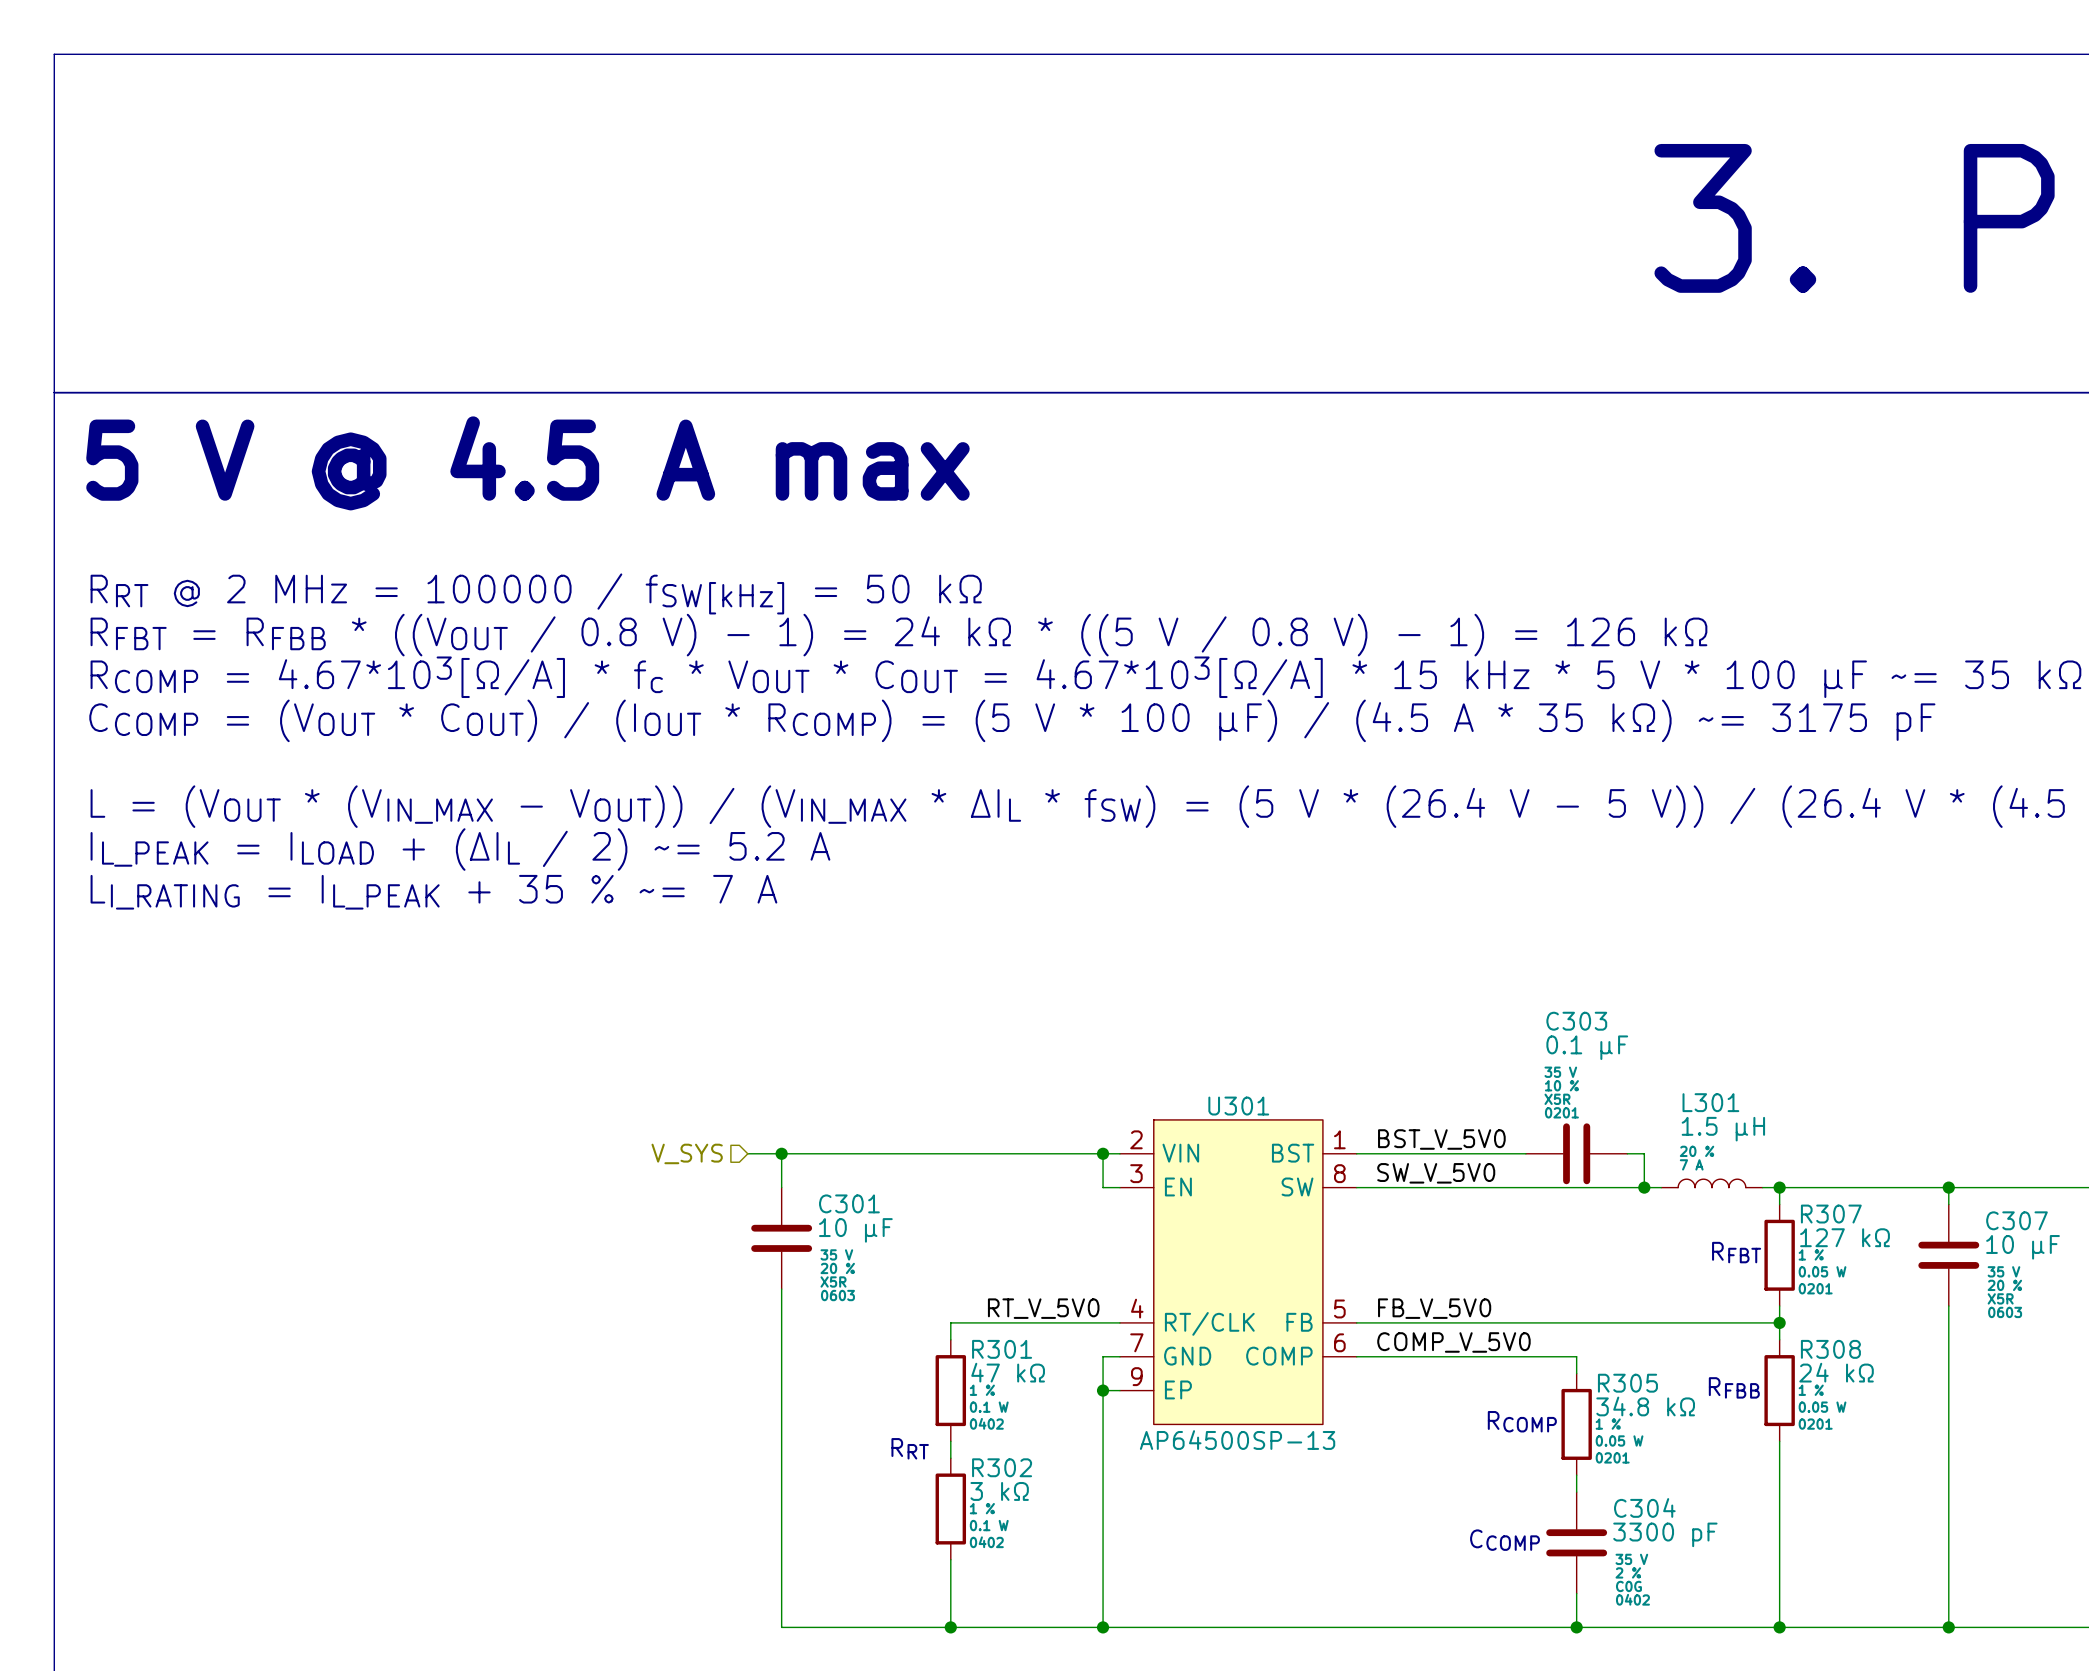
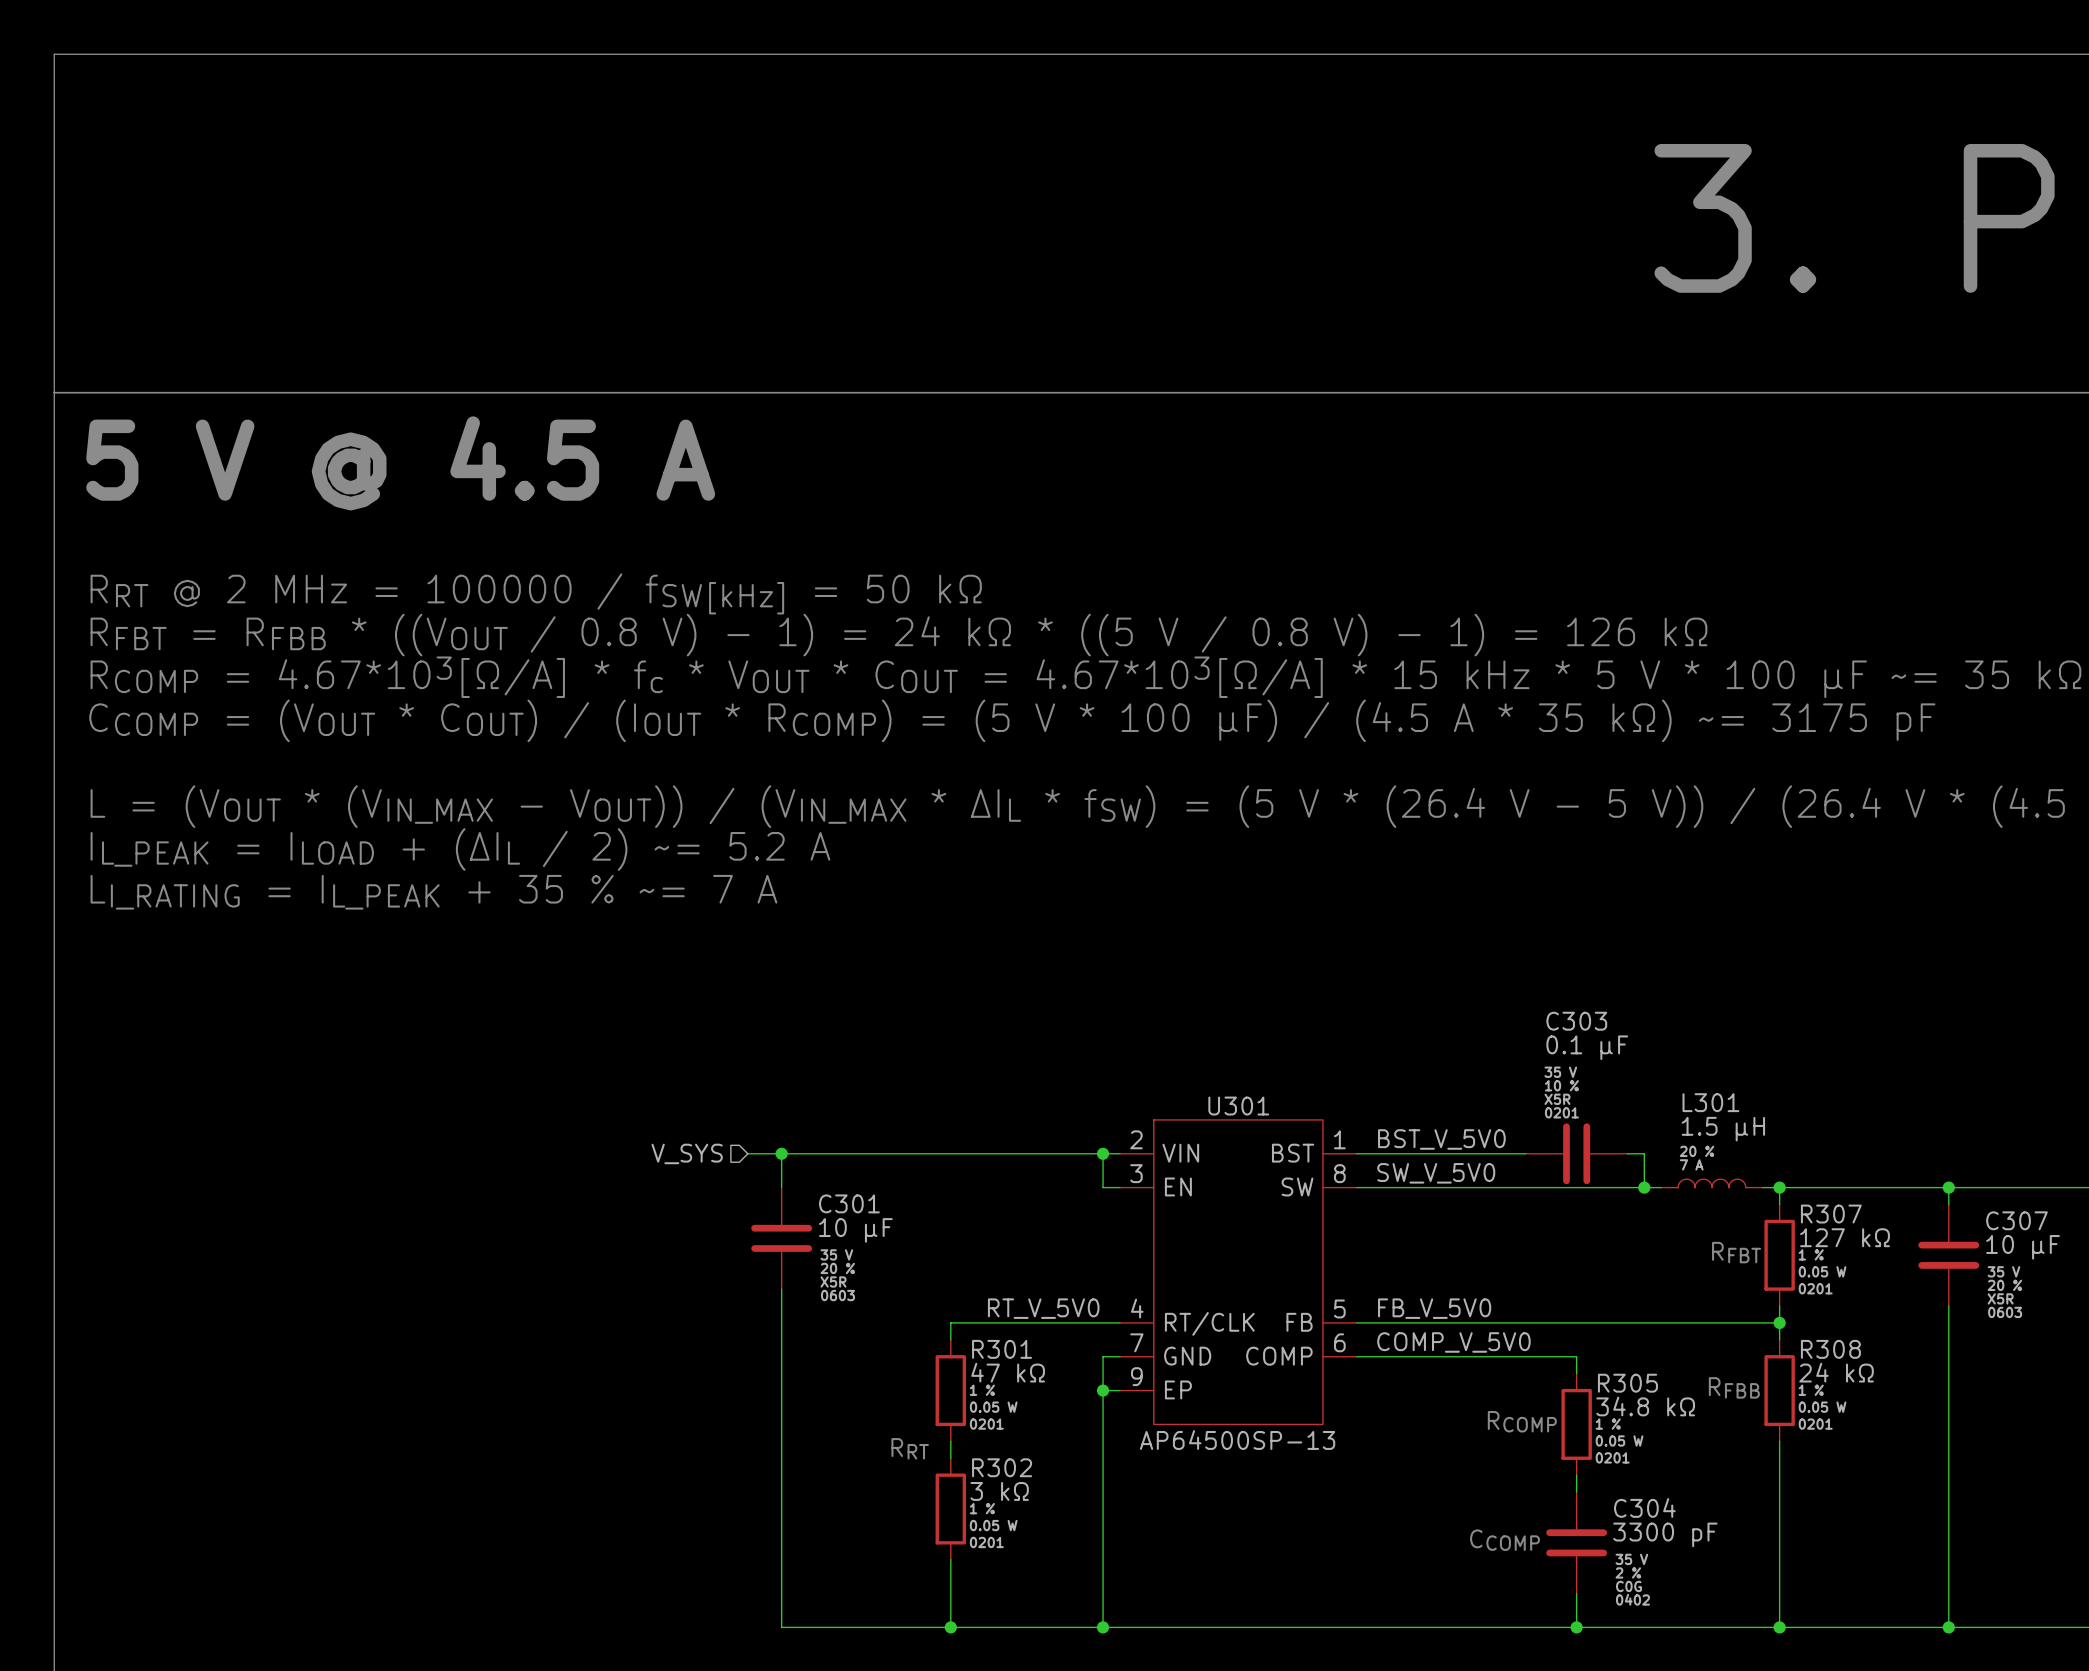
text: 5 V @ 4.5 A max (527, 463) -> 5 V @ 4.5 A (400, 463)
R301 text: 0.1 W (989, 1407) -> 0.05 W (993, 1407)
R301 text: 0402 (986, 1423) -> 0201 (986, 1424)
R302 text: 0.1 W (989, 1525) -> 0.05 W (993, 1525)
R302 text: 0402 (986, 1542) -> 0201 (986, 1542)

